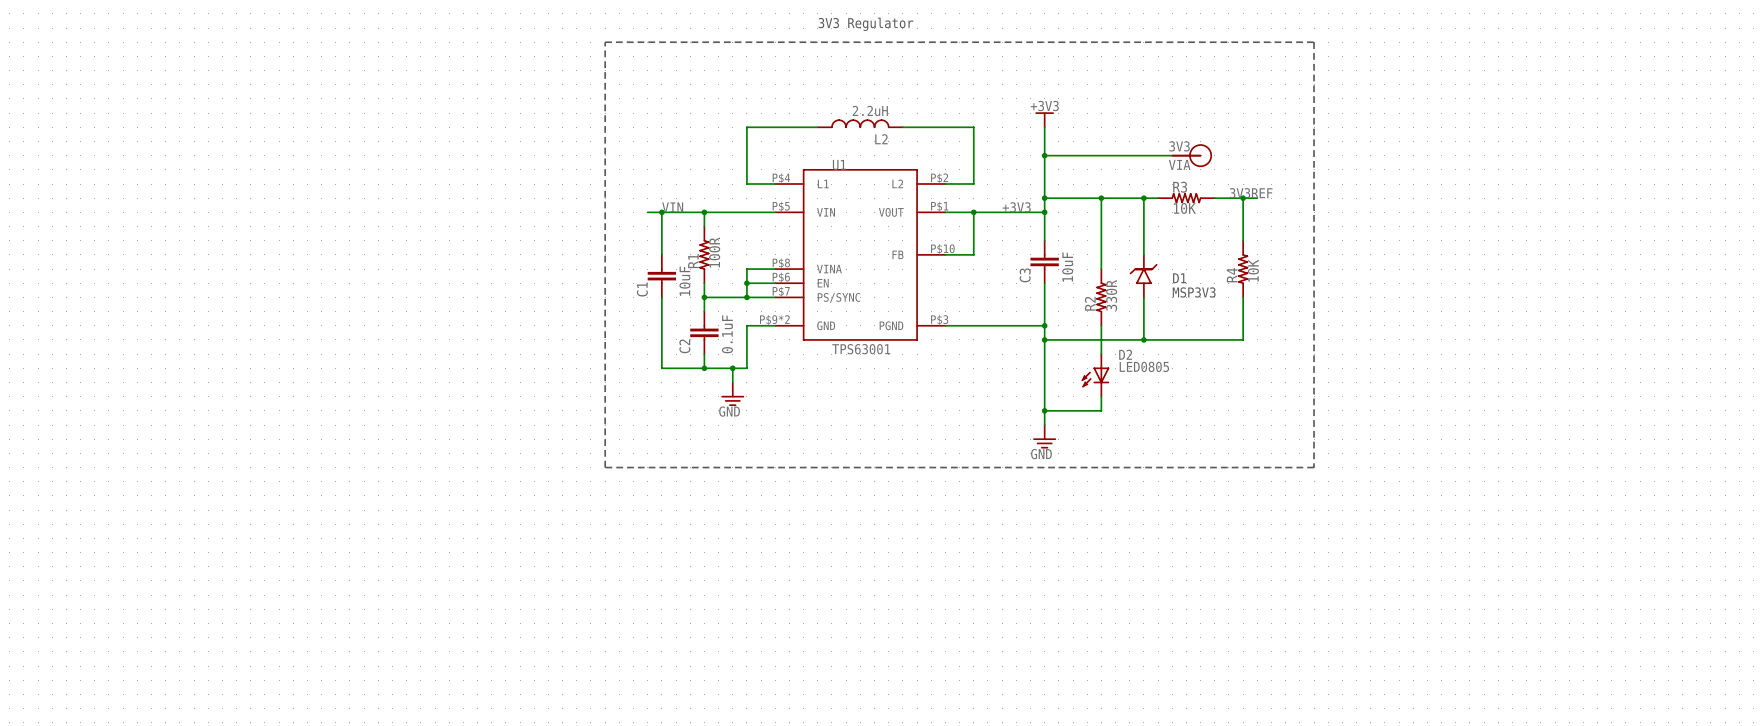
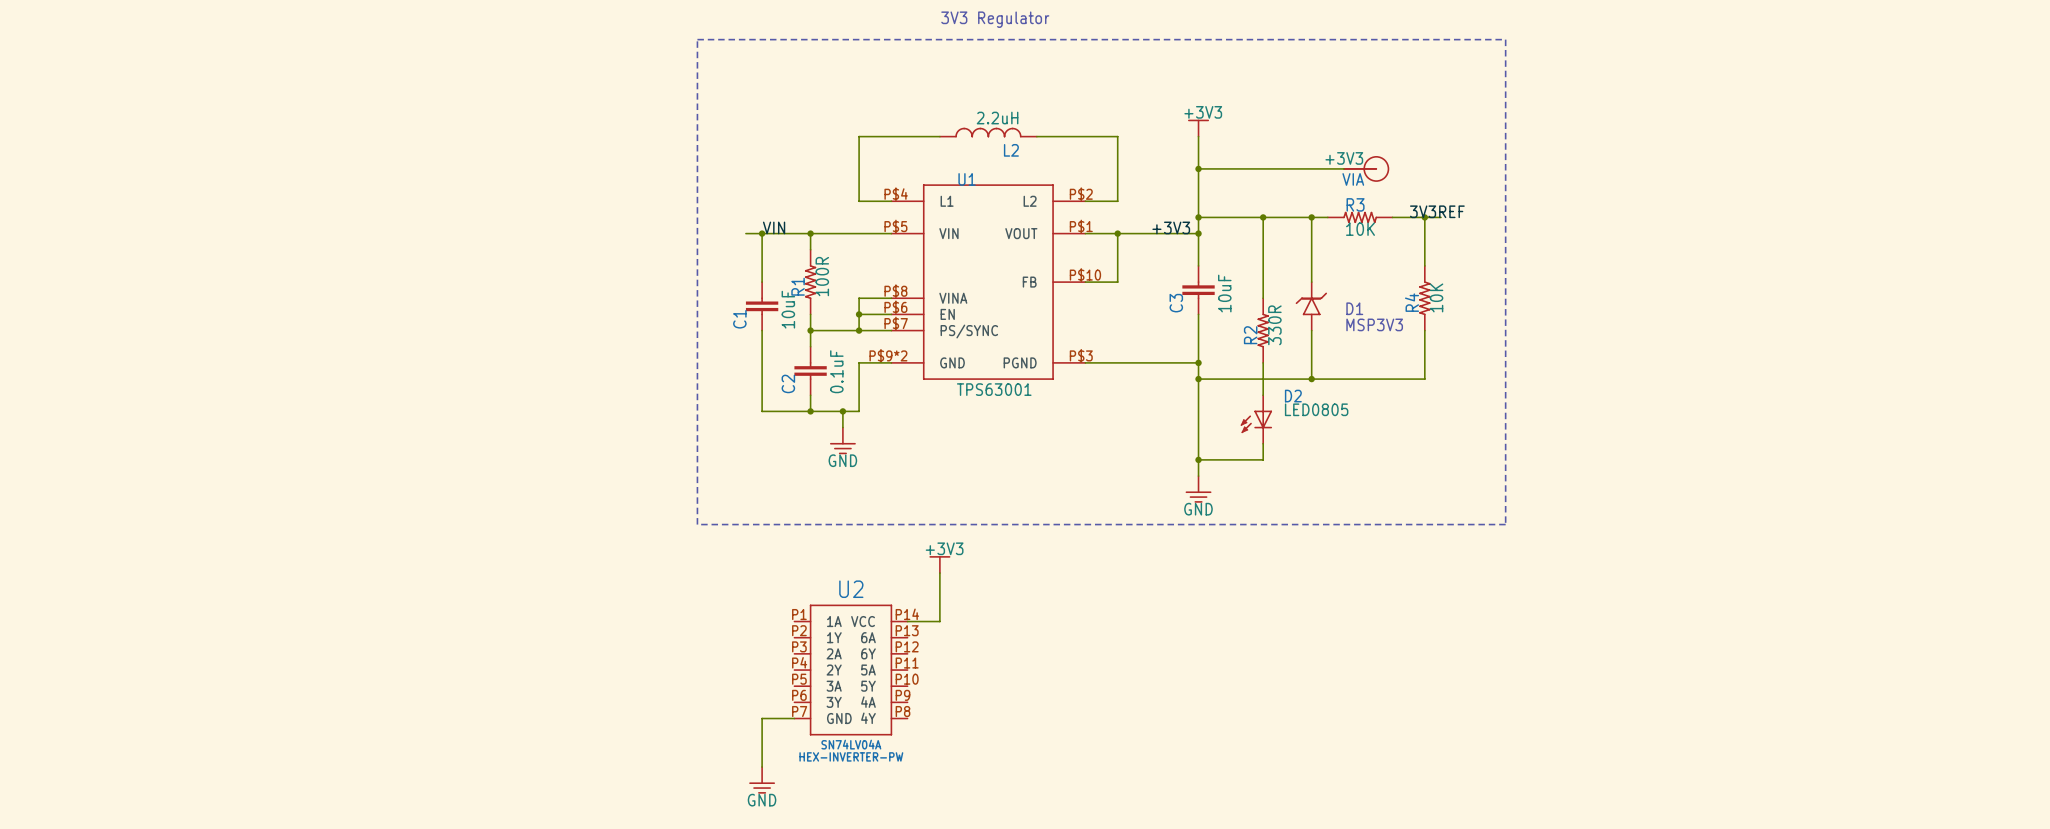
part value: 3V3 (1179, 146) -> +3V3 (1344, 158)
power symbol: none -> +3V3 (939, 564)
wire: none -> (939, 573) (939, 621) (907, 621)
U2: none -> (850, 670)
wire: none -> (794, 718) (762, 718) (762, 767)
power symbol: none -> GND (762, 780)

